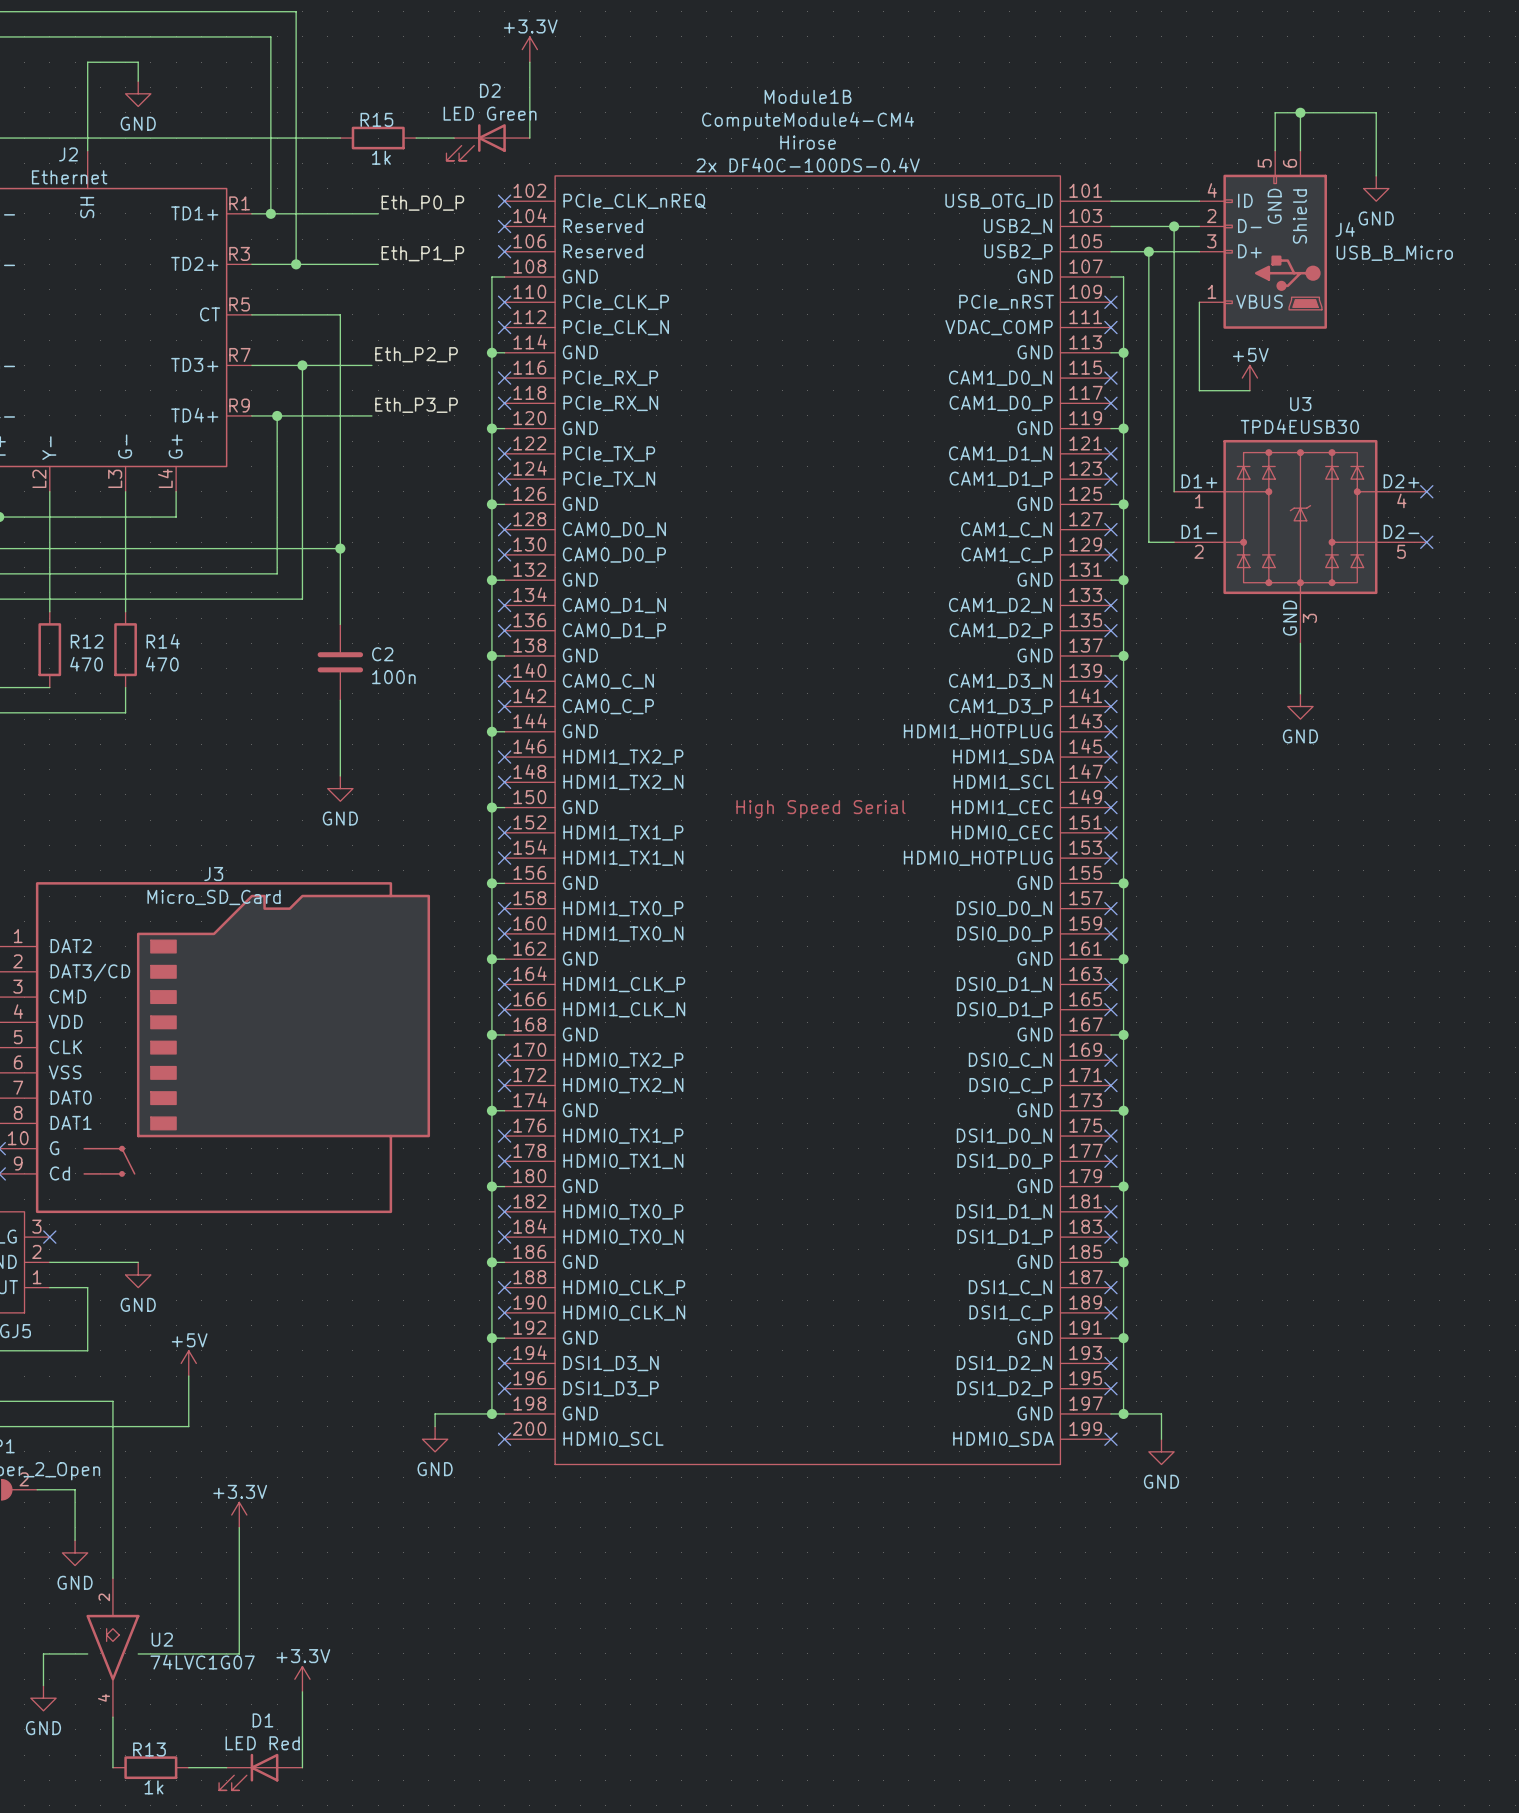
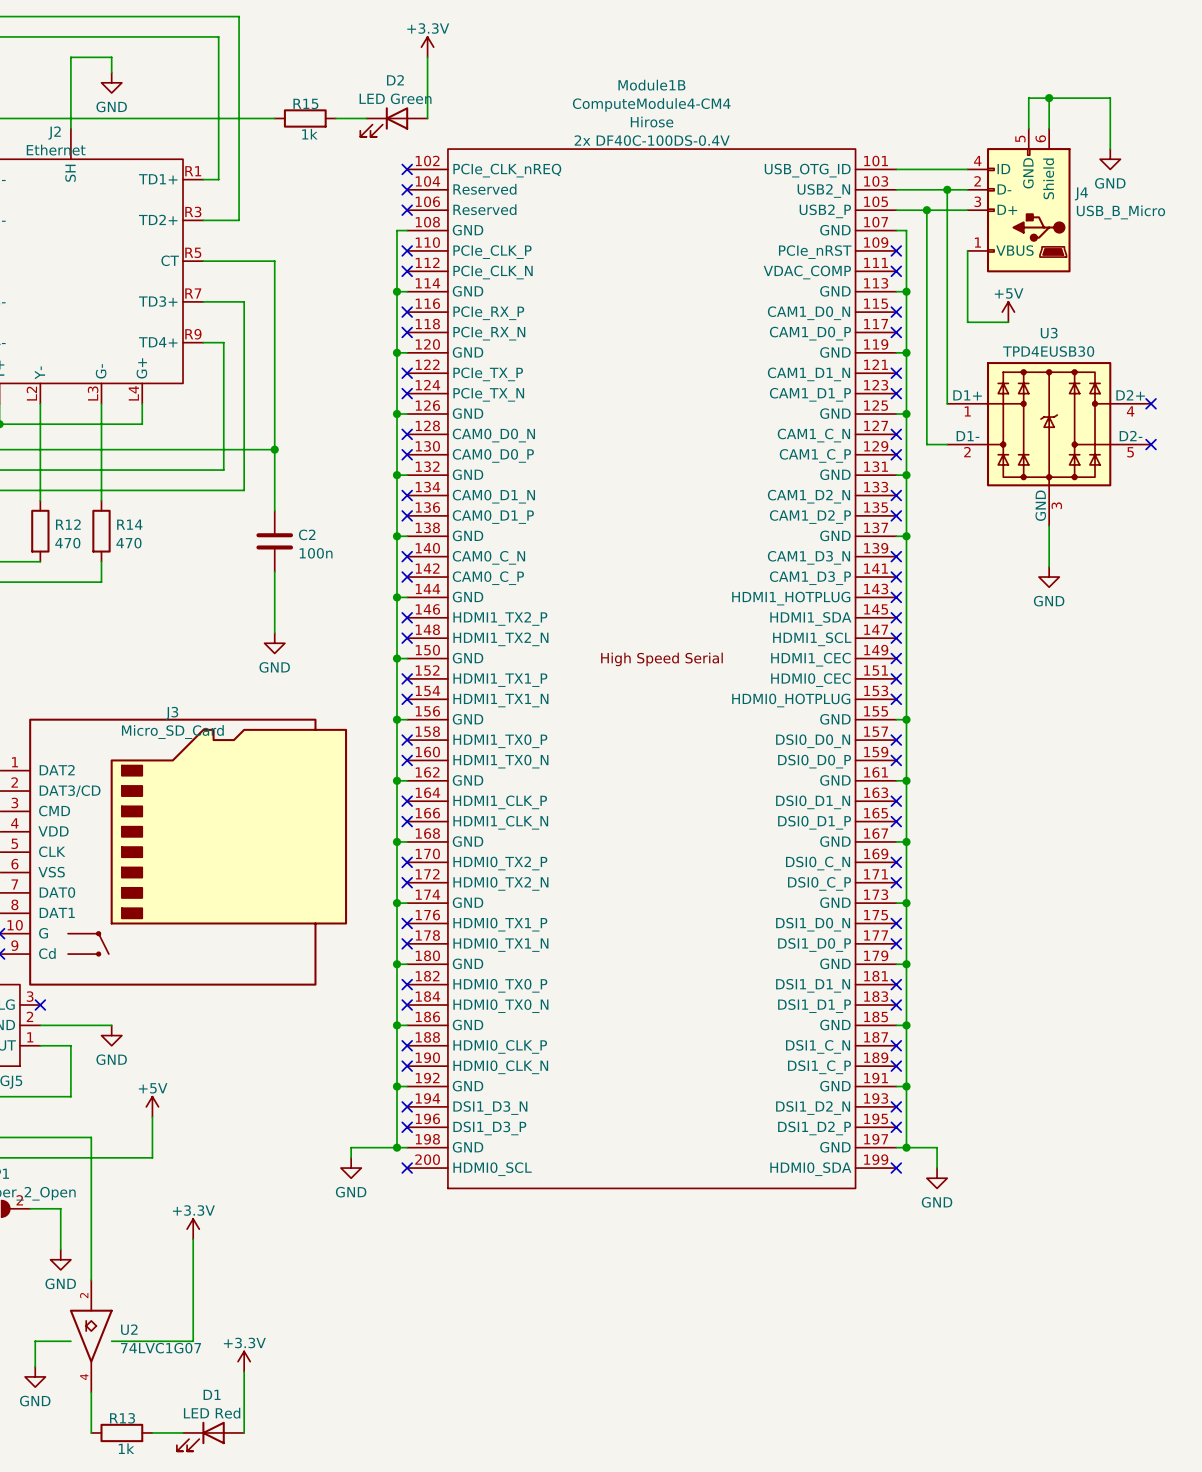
label: Eth_P0_P (422, 203) -> none
wire: (270, 213) (378, 213) -> none
junction: (270, 213) -> none
label: Eth_P1_P (422, 253) -> none
wire: (296, 264) (378, 264) -> none
junction: (296, 264) -> none
label: Eth_P2_P (416, 354) -> none
wire: (302, 365) (371, 365) -> none
junction: (302, 365) -> none
label: Eth_P3_P (416, 405) -> none
wire: (277, 415) (371, 415) -> none
junction: (277, 415) -> none

